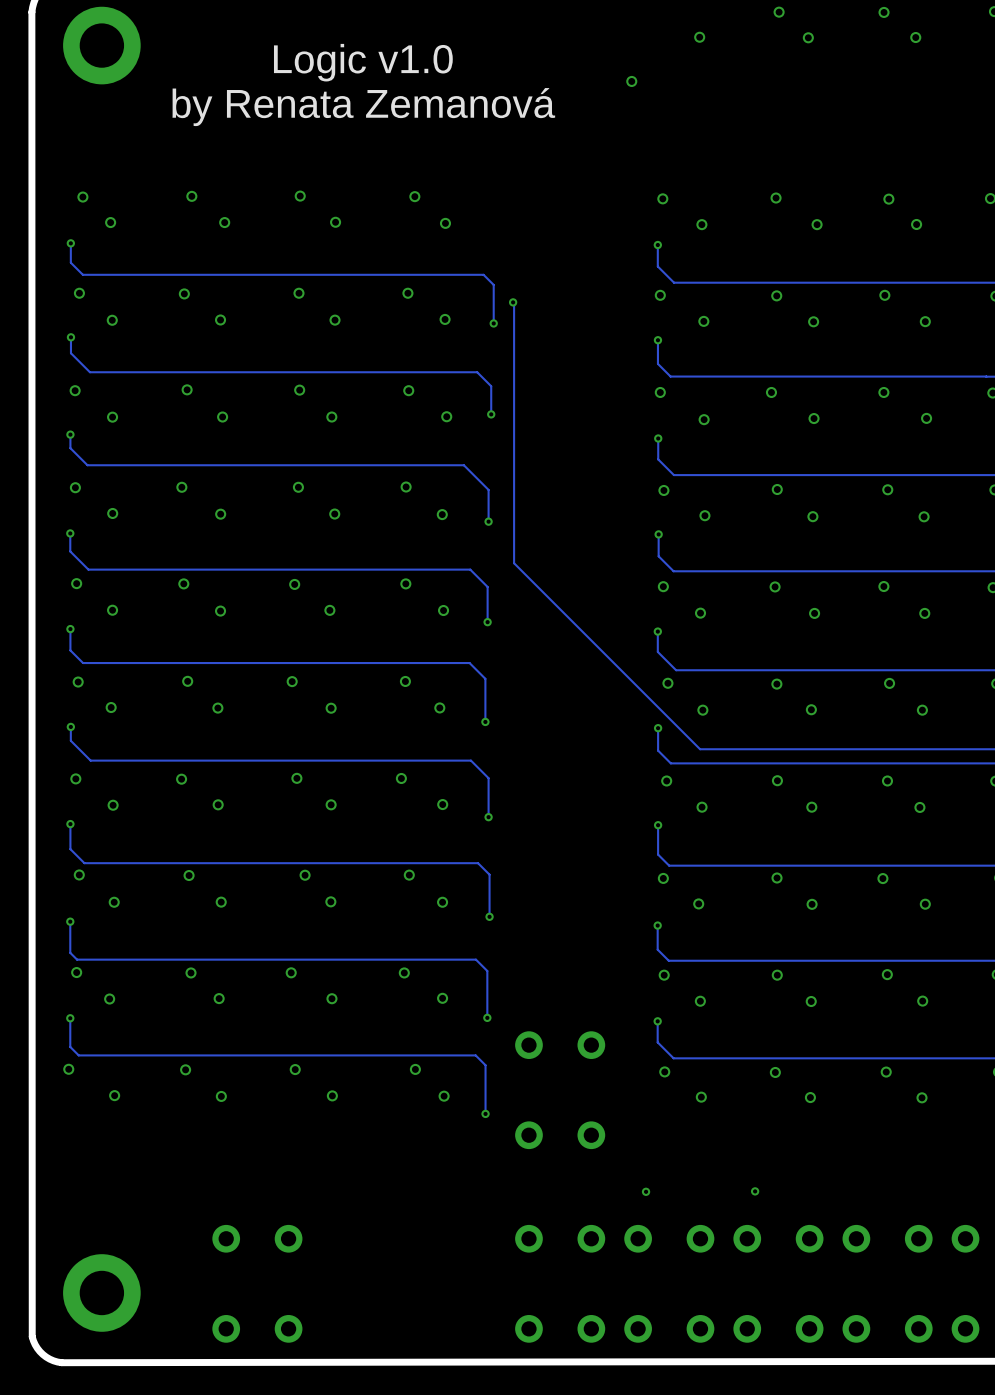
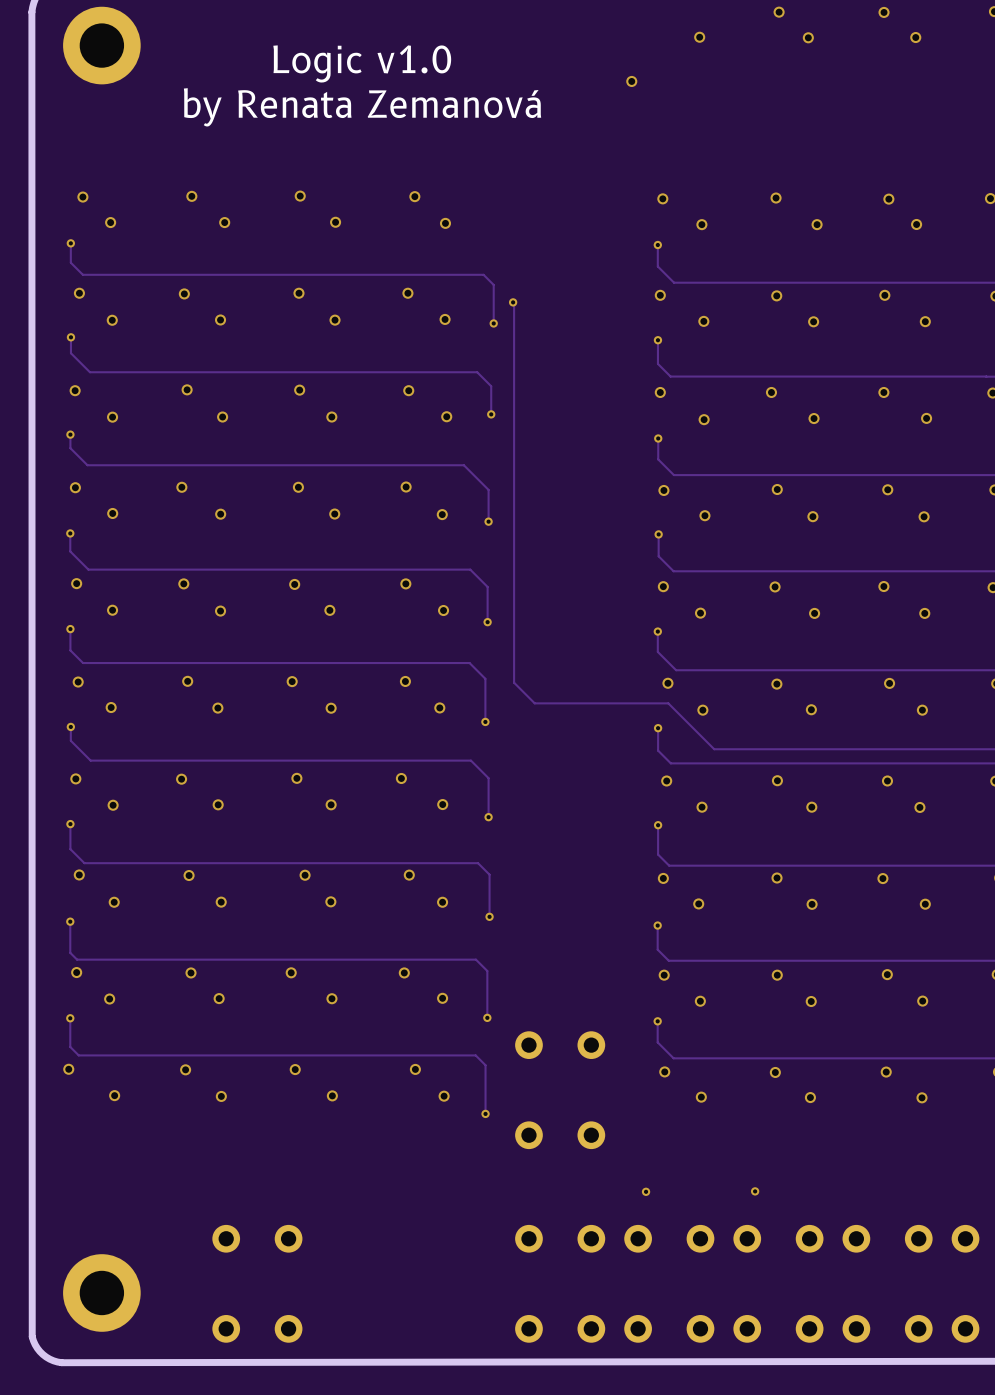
track: (514, 563) (700, 749) (714, 749) -> (514, 563) (514, 682) (534, 703) (668, 703) (714, 749)

